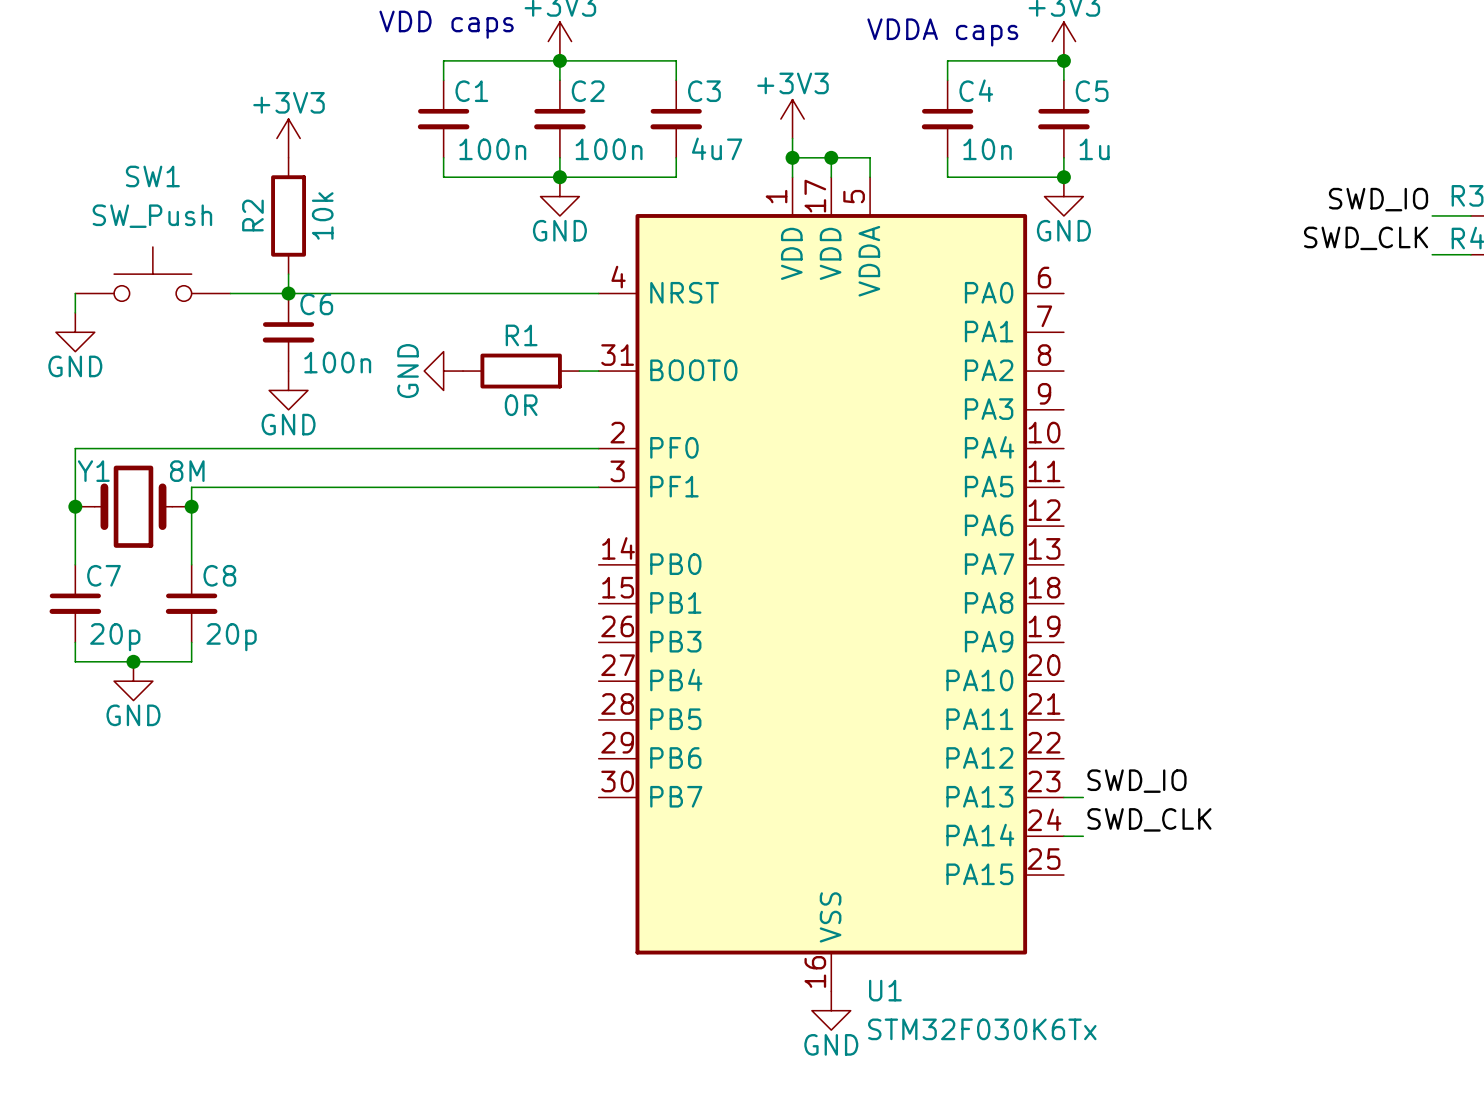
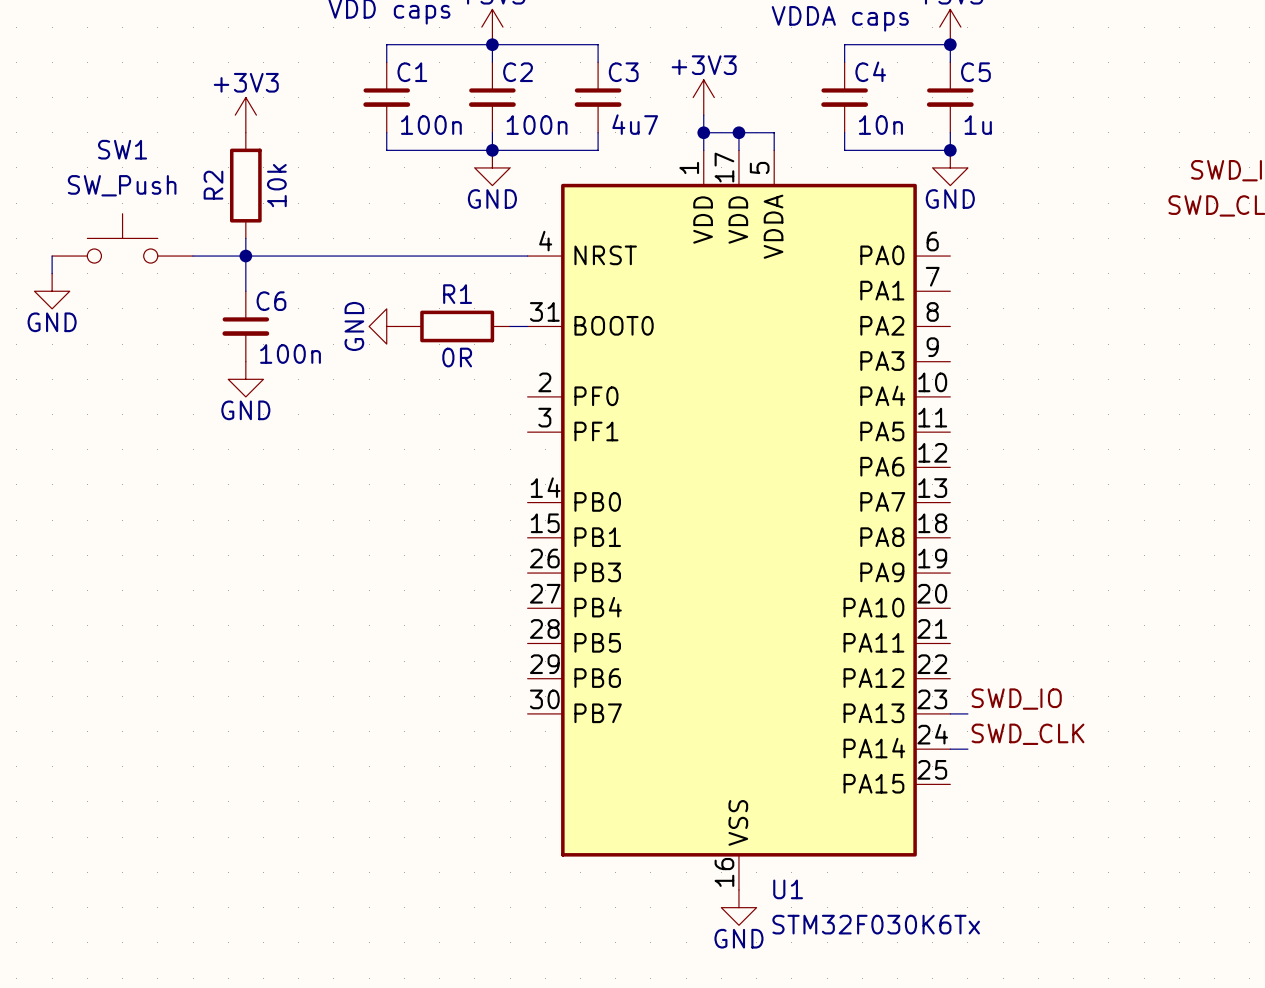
C6 position: (288, 332) -> (245, 326)
power symbol position: GND (288, 390) -> GND (245, 379)
wire: (598, 448) (75, 448) (75, 564) -> none
wire: (598, 487) (191, 487) (191, 564) -> none
junction: (75, 506) -> none
Y1: 8M (133, 506) -> none
junction: (191, 506) -> none
C7: 20p (75, 603) -> none
C8: 20p (191, 603) -> none
wire: (75, 642) (75, 661) (191, 661) (191, 642) -> none
junction: (133, 661) -> none
power symbol: GND (133, 681) -> none

